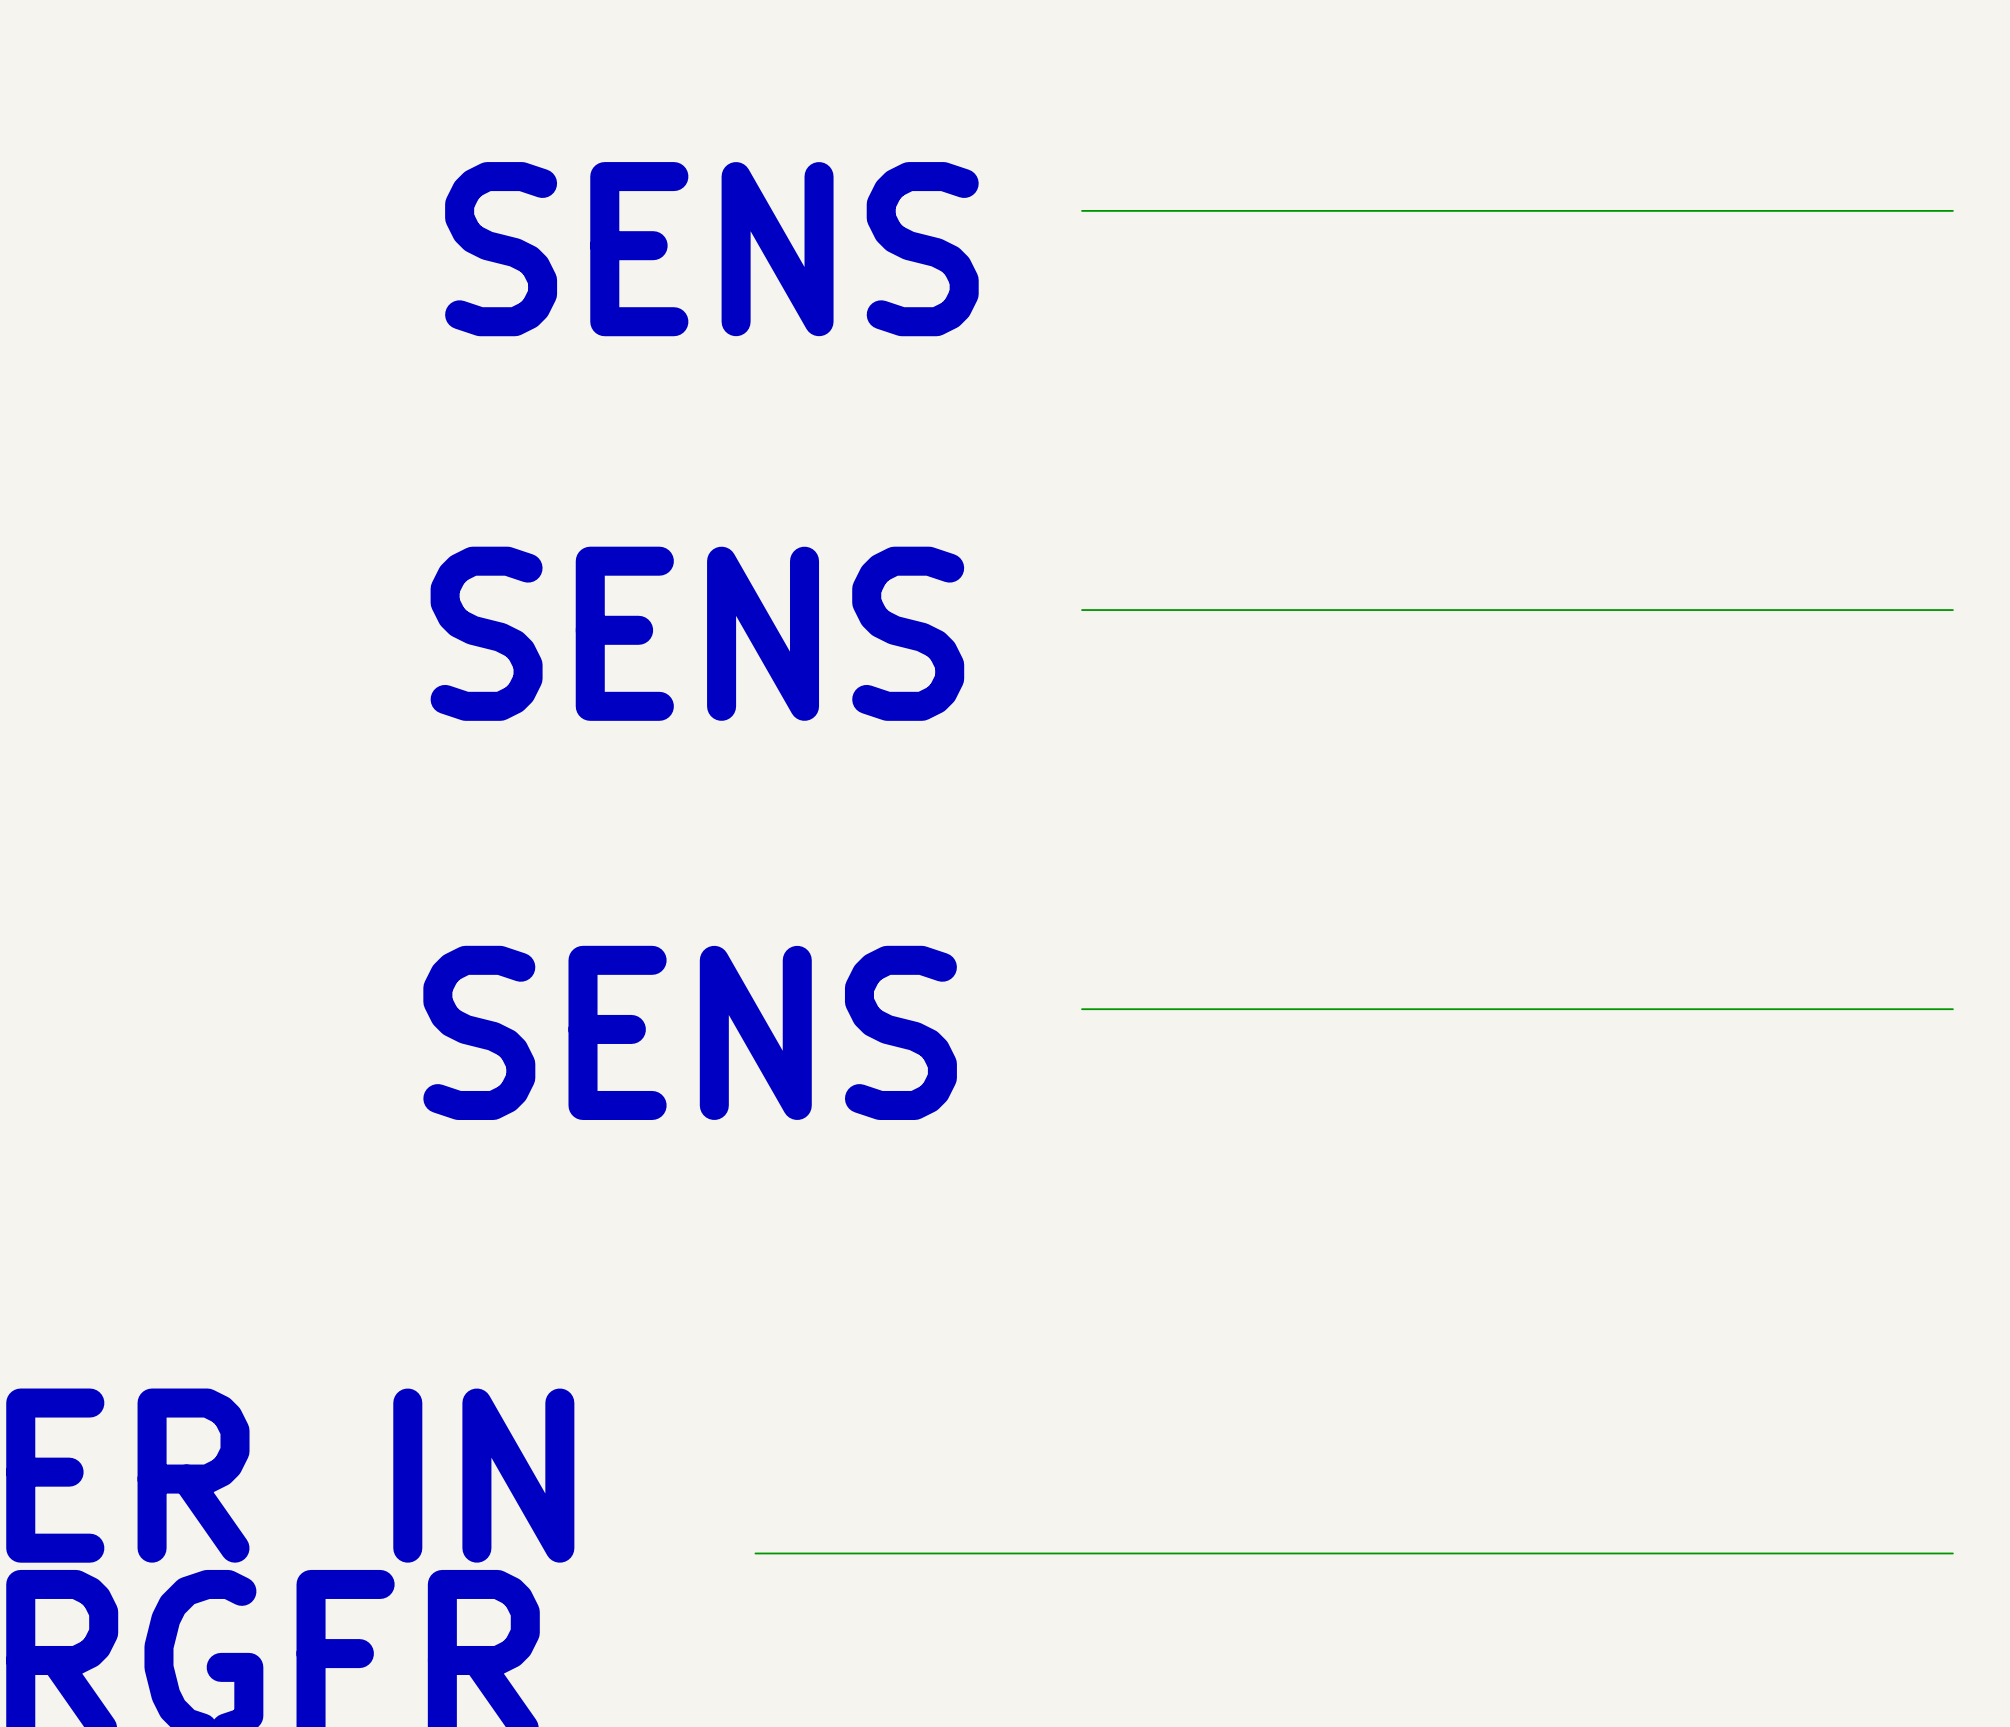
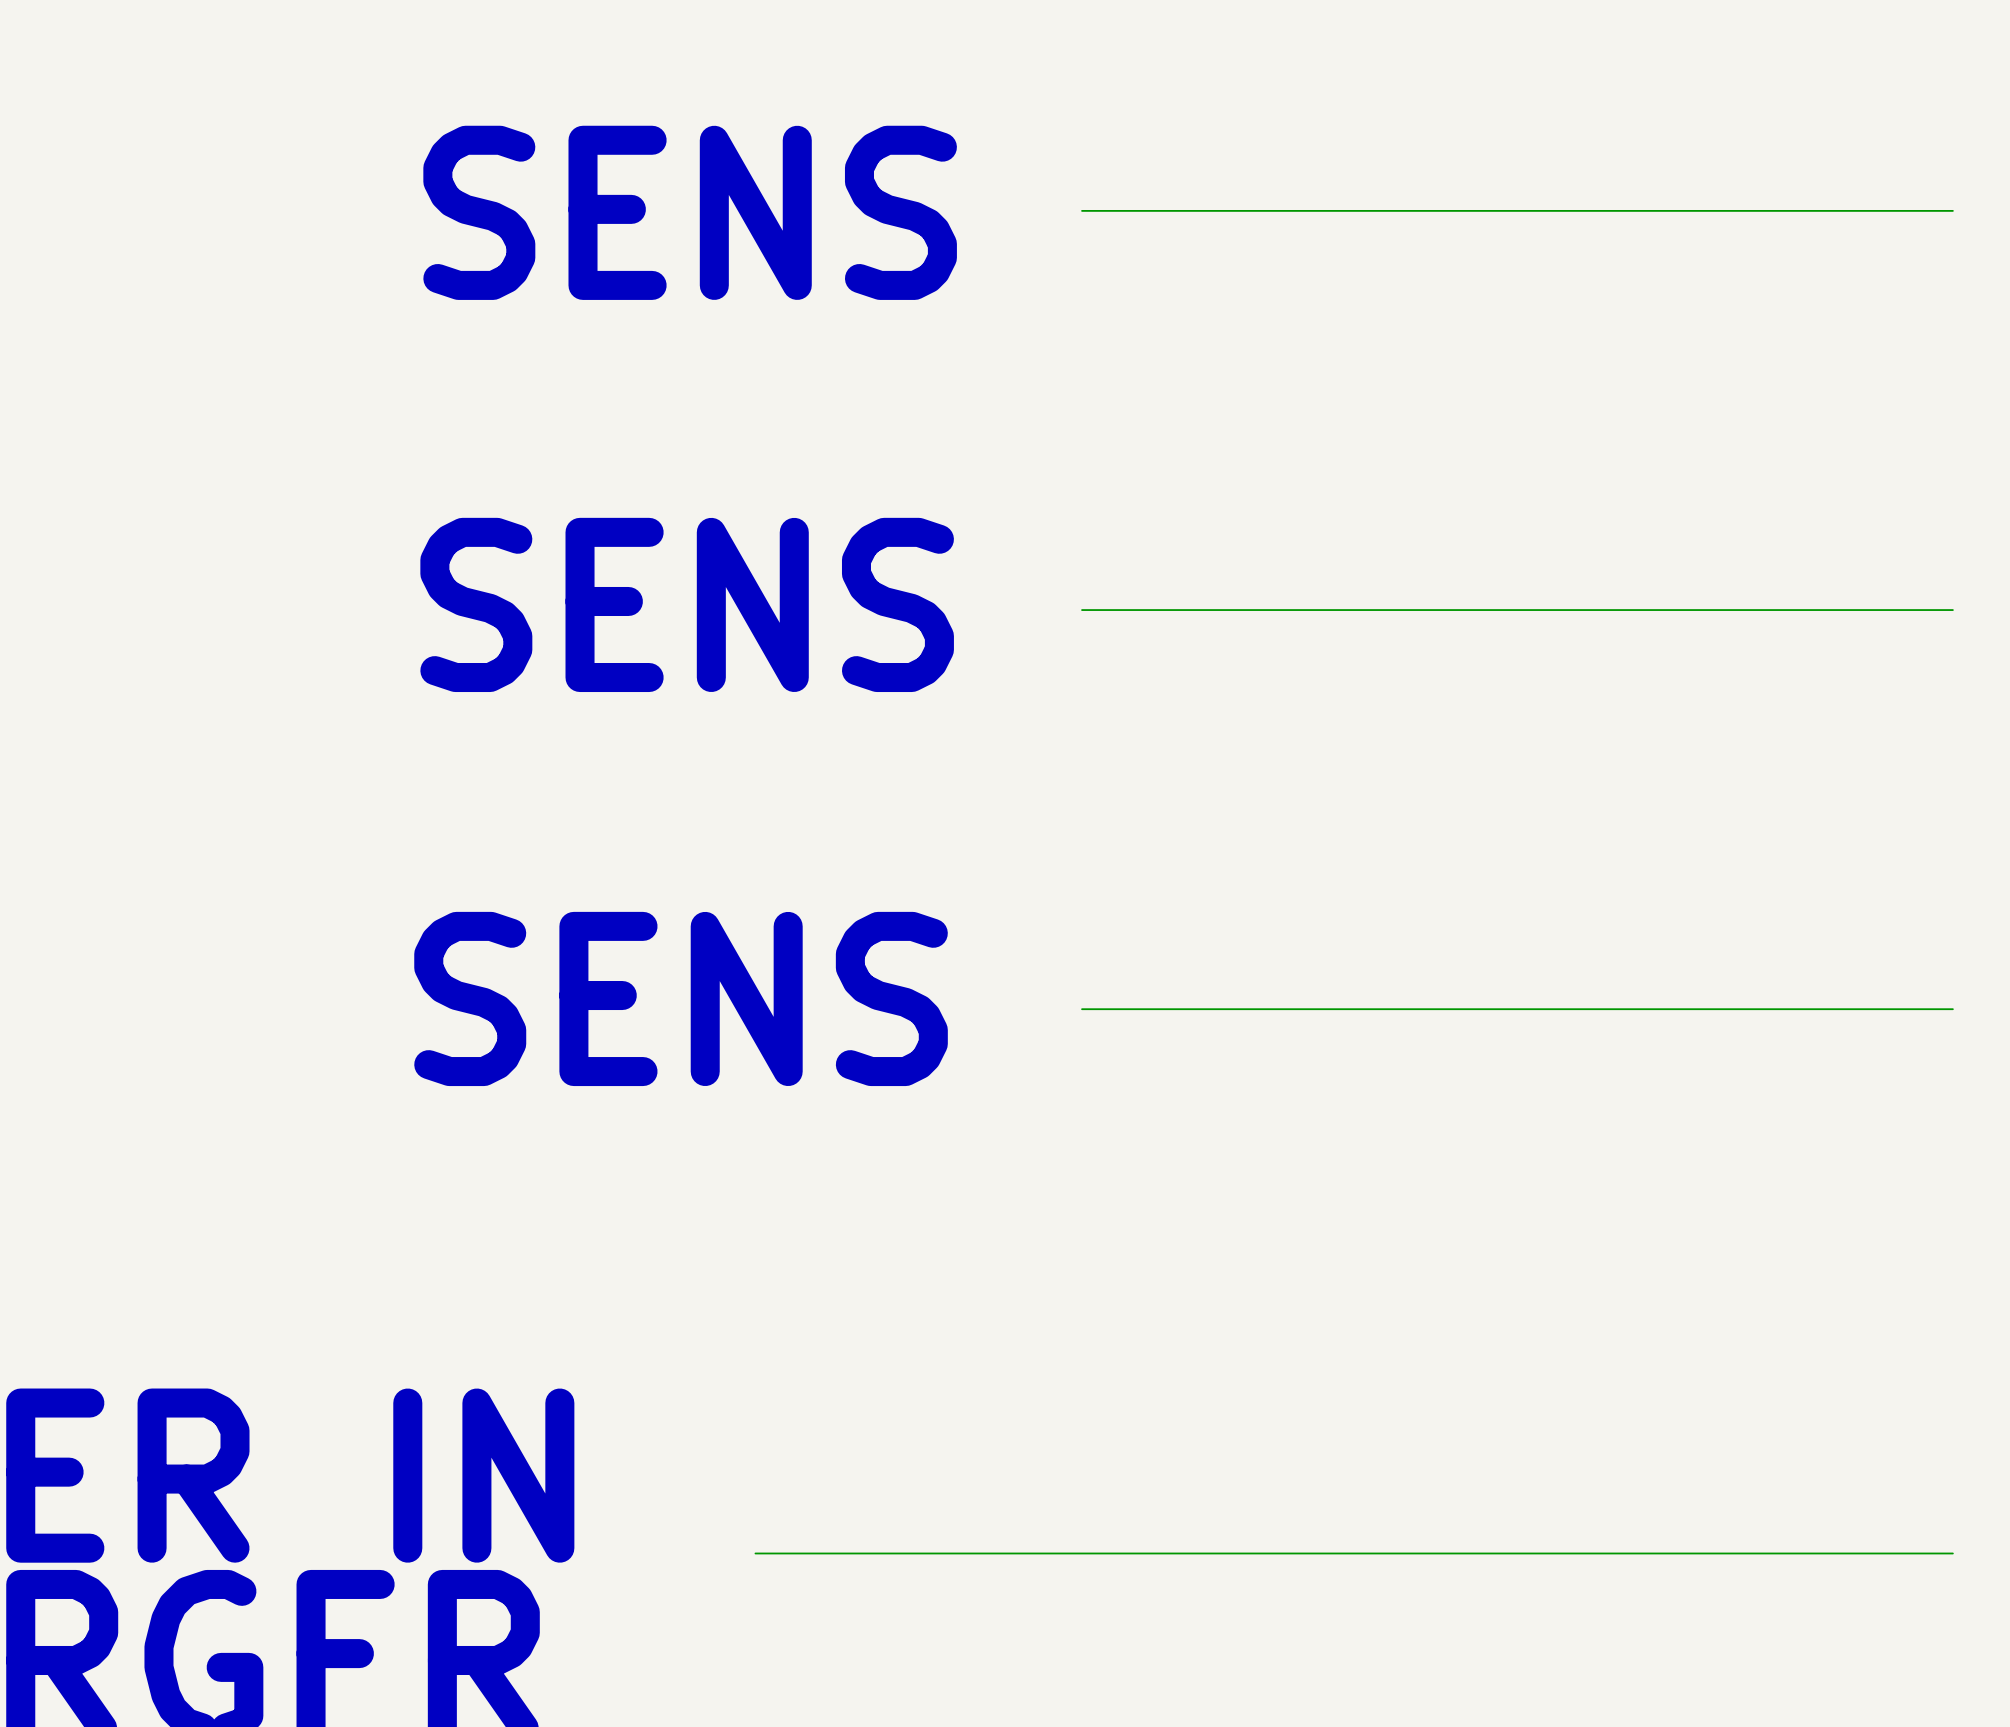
text position: SENS (711, 249) -> SENS (690, 212)
text position: SENS (697, 633) -> SENS (687, 604)
text position: SENS (690, 1032) -> SENS (681, 998)

